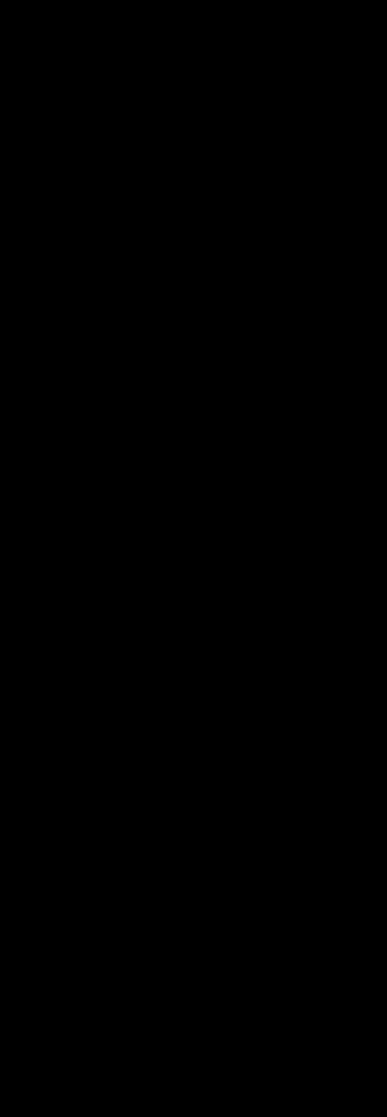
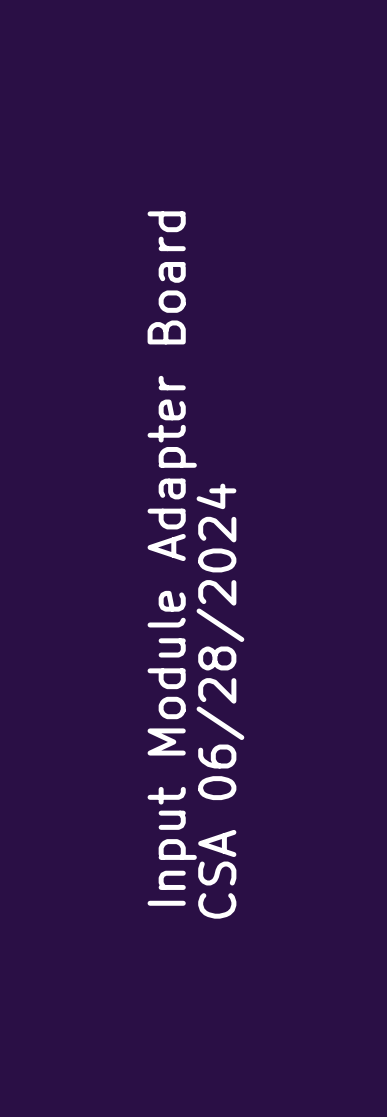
text: none -> Input Module Adapter Board (172, 558)
text: none -> CSA 06/28/2024 (220, 701)

